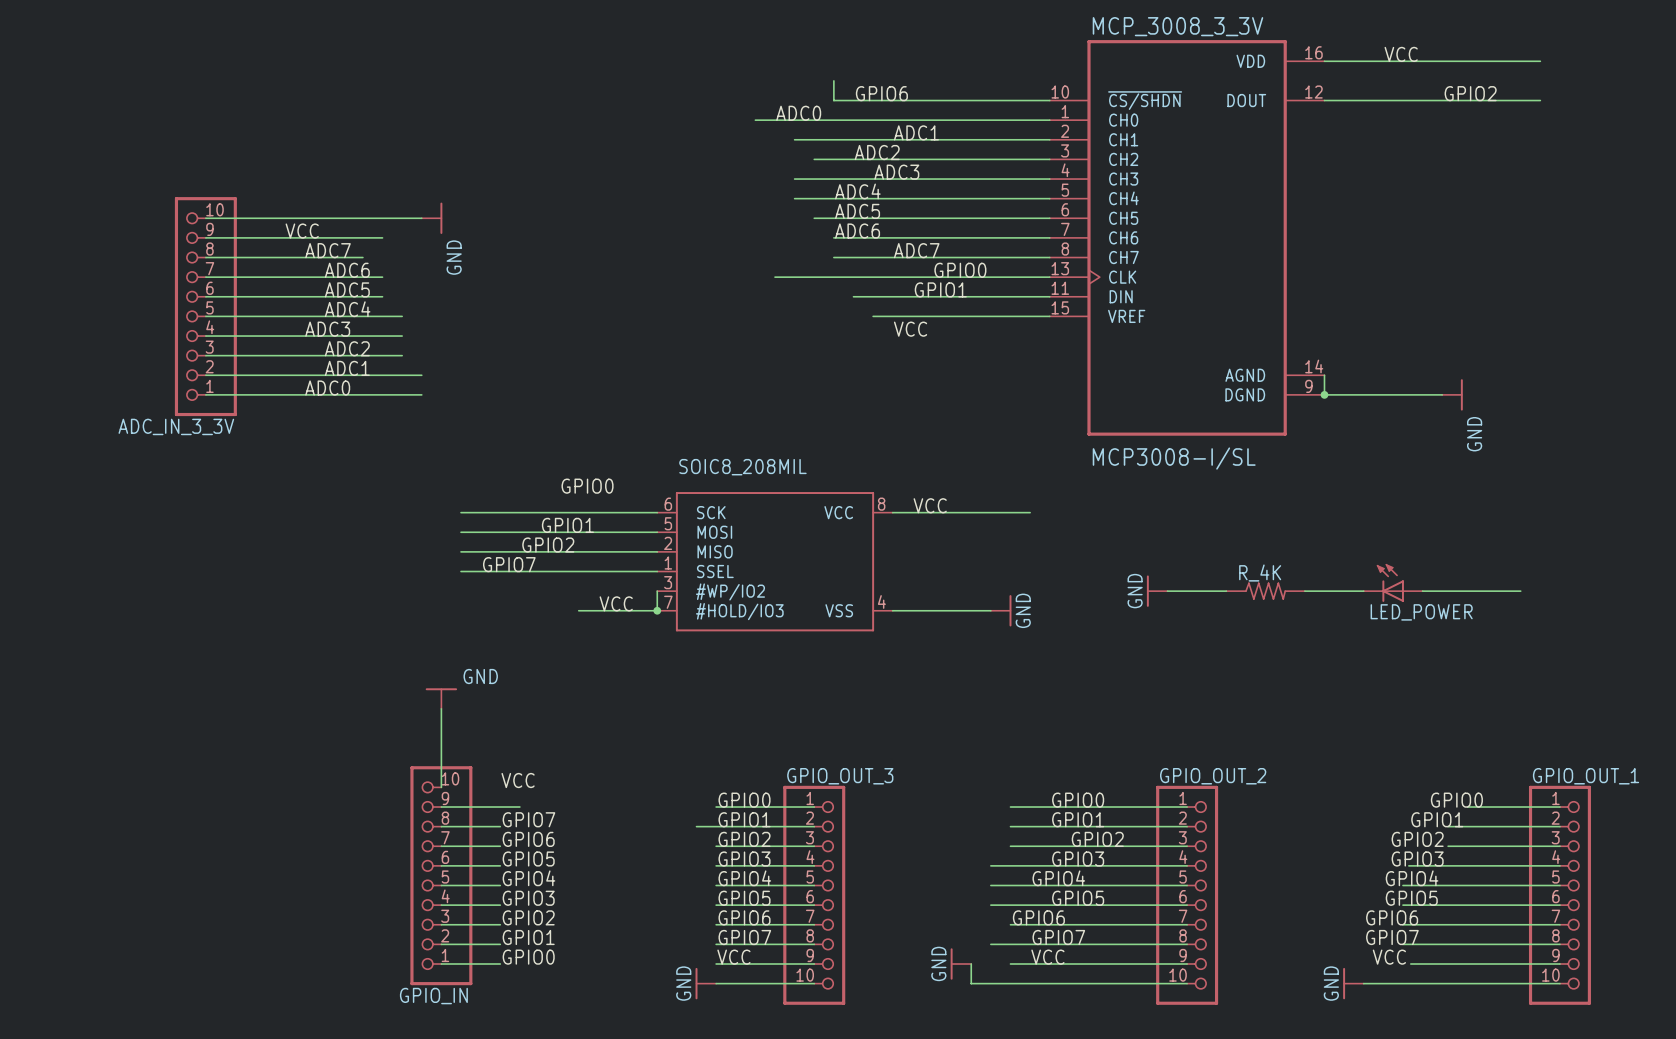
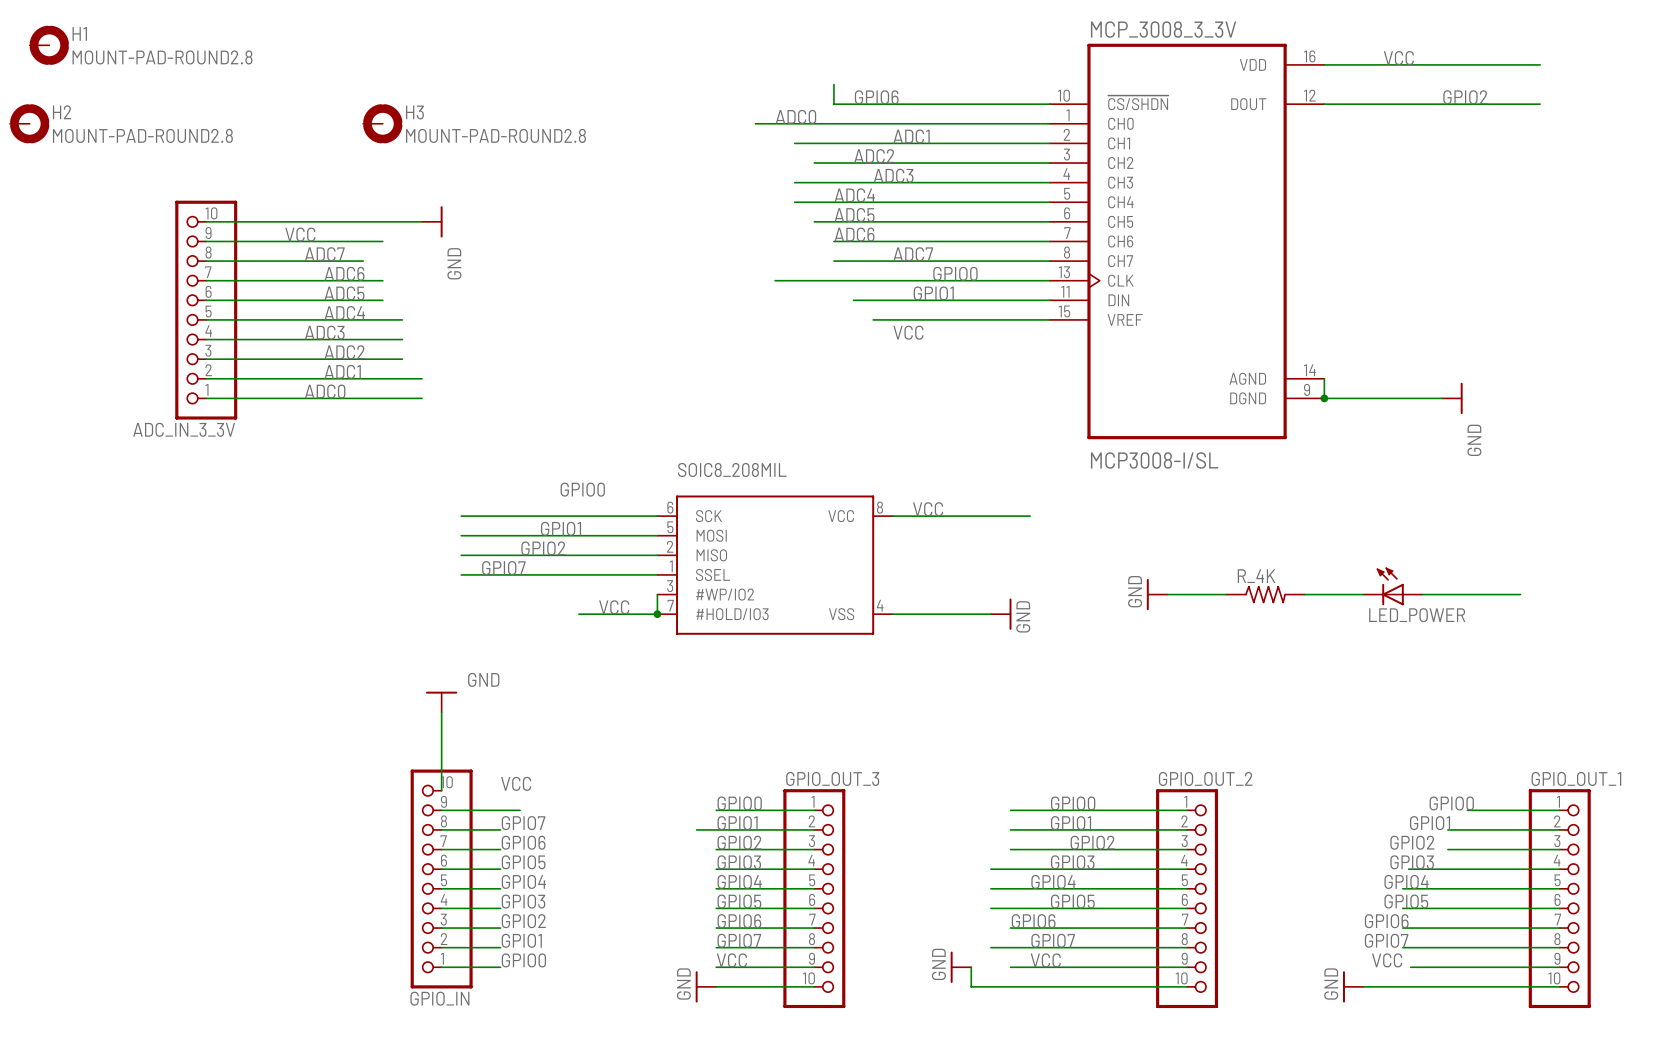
H1: none -> MOUNT-PAD-ROUND2.8 (49, 45)
H2: none -> MOUNT-PAD-ROUND2.8 (29, 123)
H3: none -> MOUNT-PAD-ROUND2.8 (382, 123)

